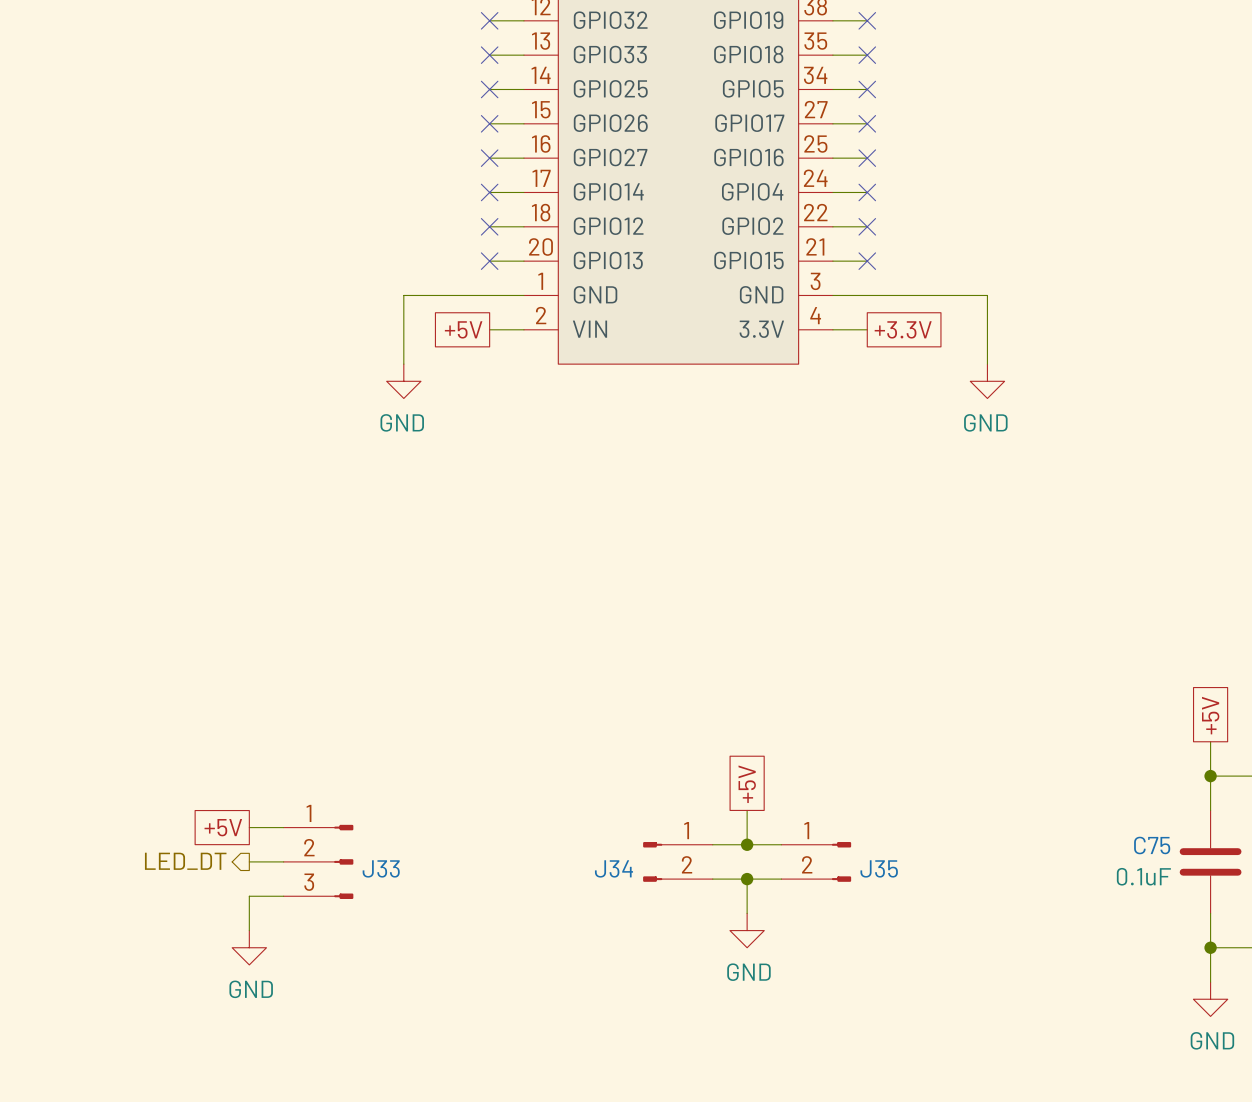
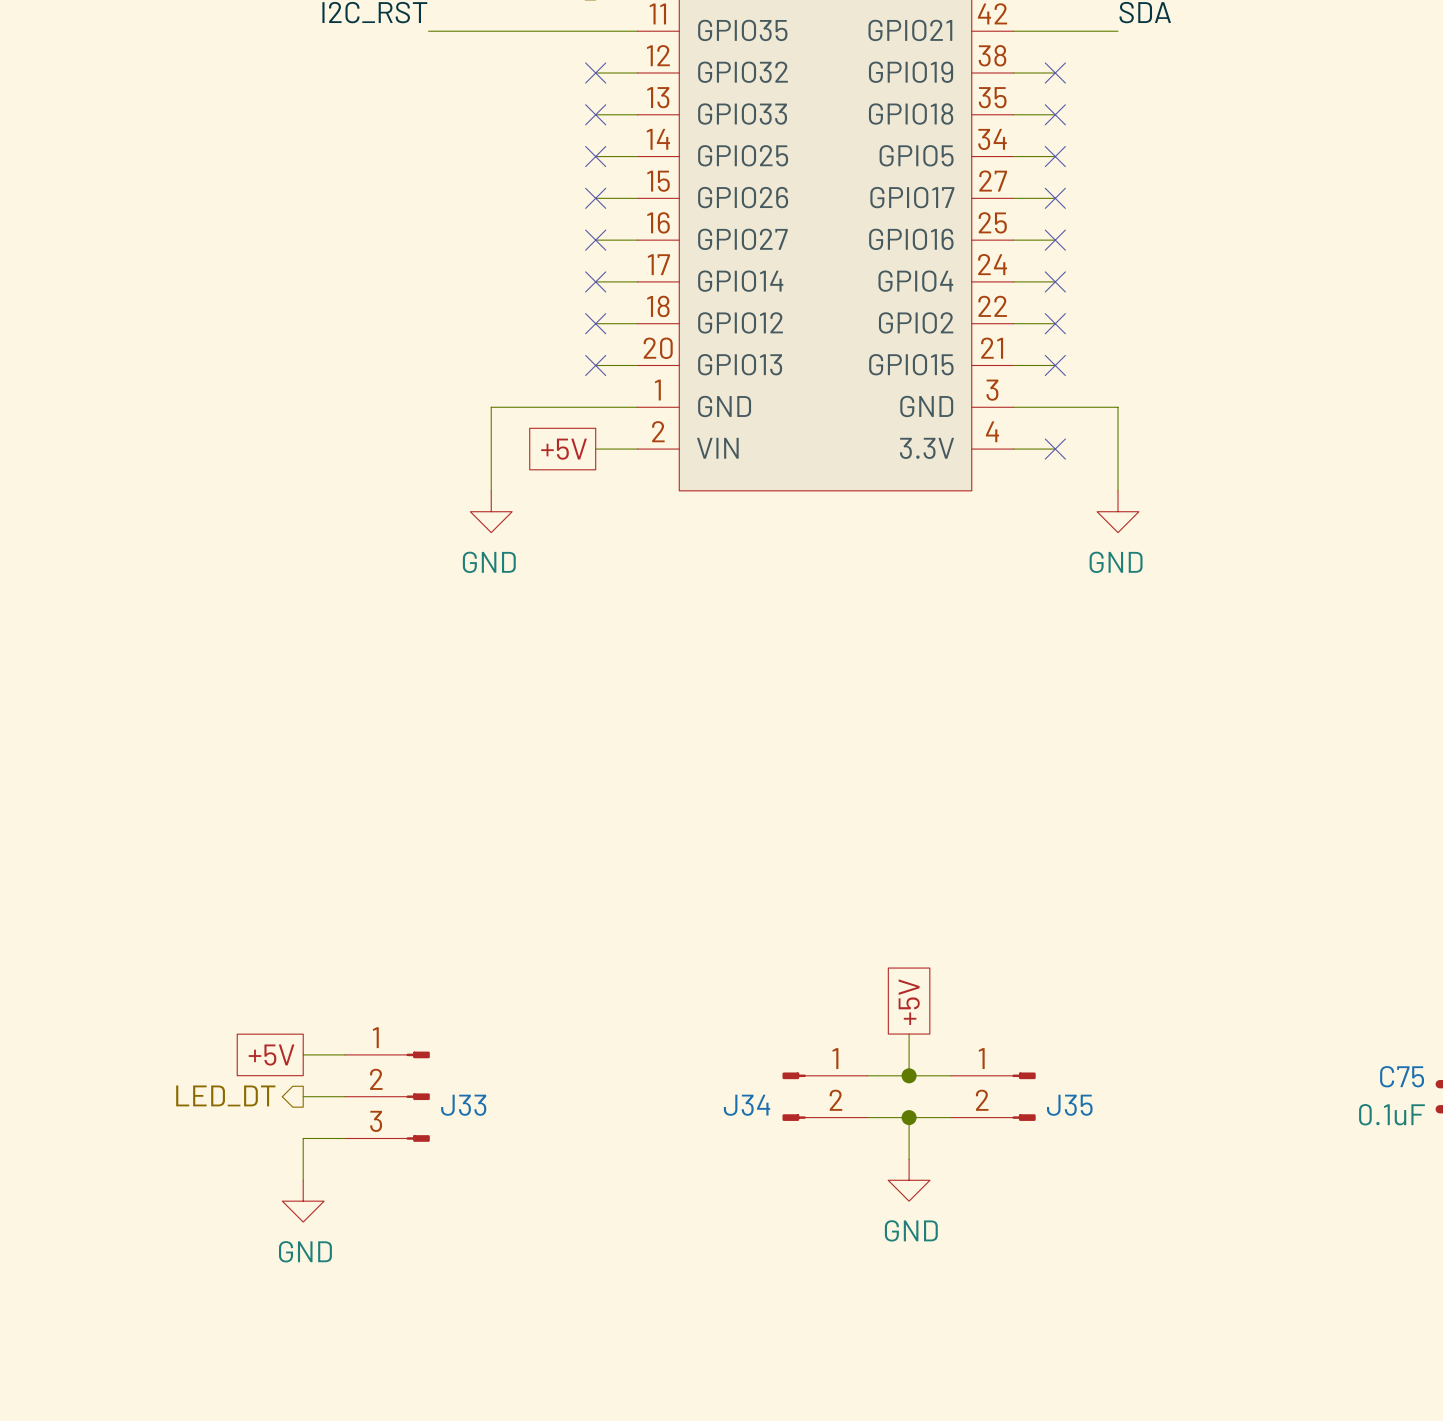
wire: (918, 295) (987, 295) (987, 364) -> (1118, 407) (1118, 490)
no-connect mark: none -> (1055, 449)
global label: +3.3V (903, 329) -> none
power symbol position: GND (987, 381) -> GND (1118, 511)

